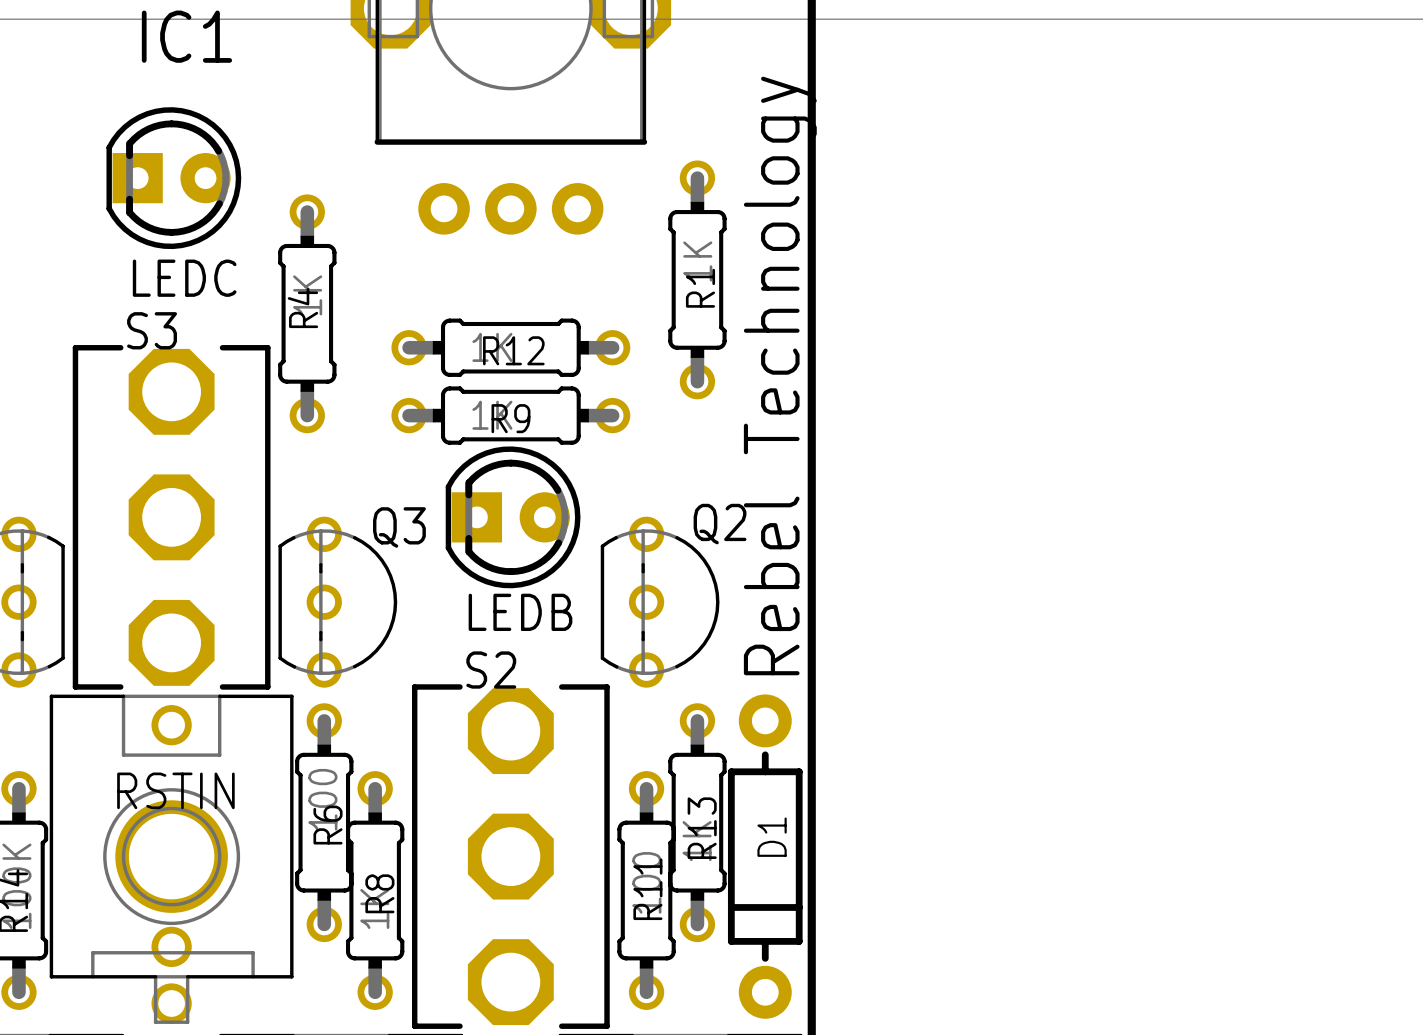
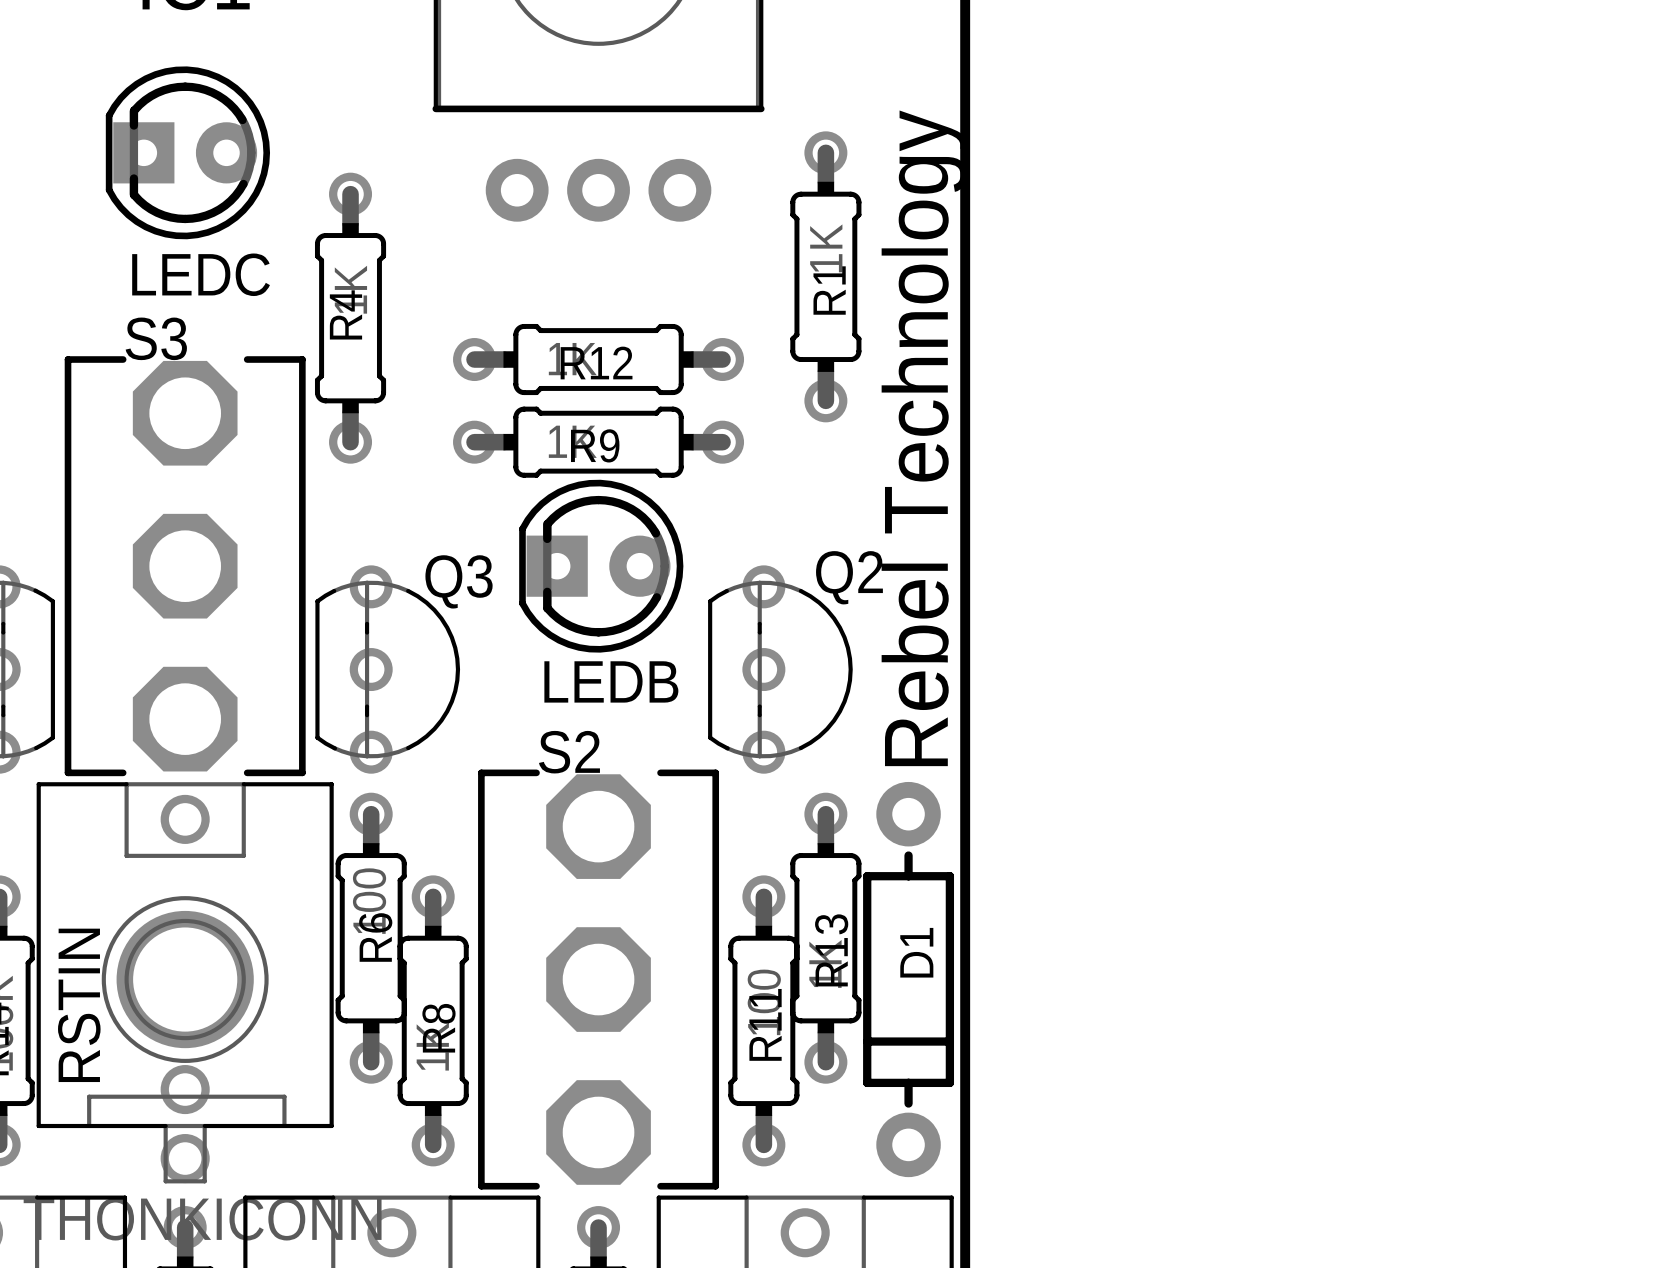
RSTIN name rotation: 0° (175, 790) -> 90° counterclockwise (79, 1005)

